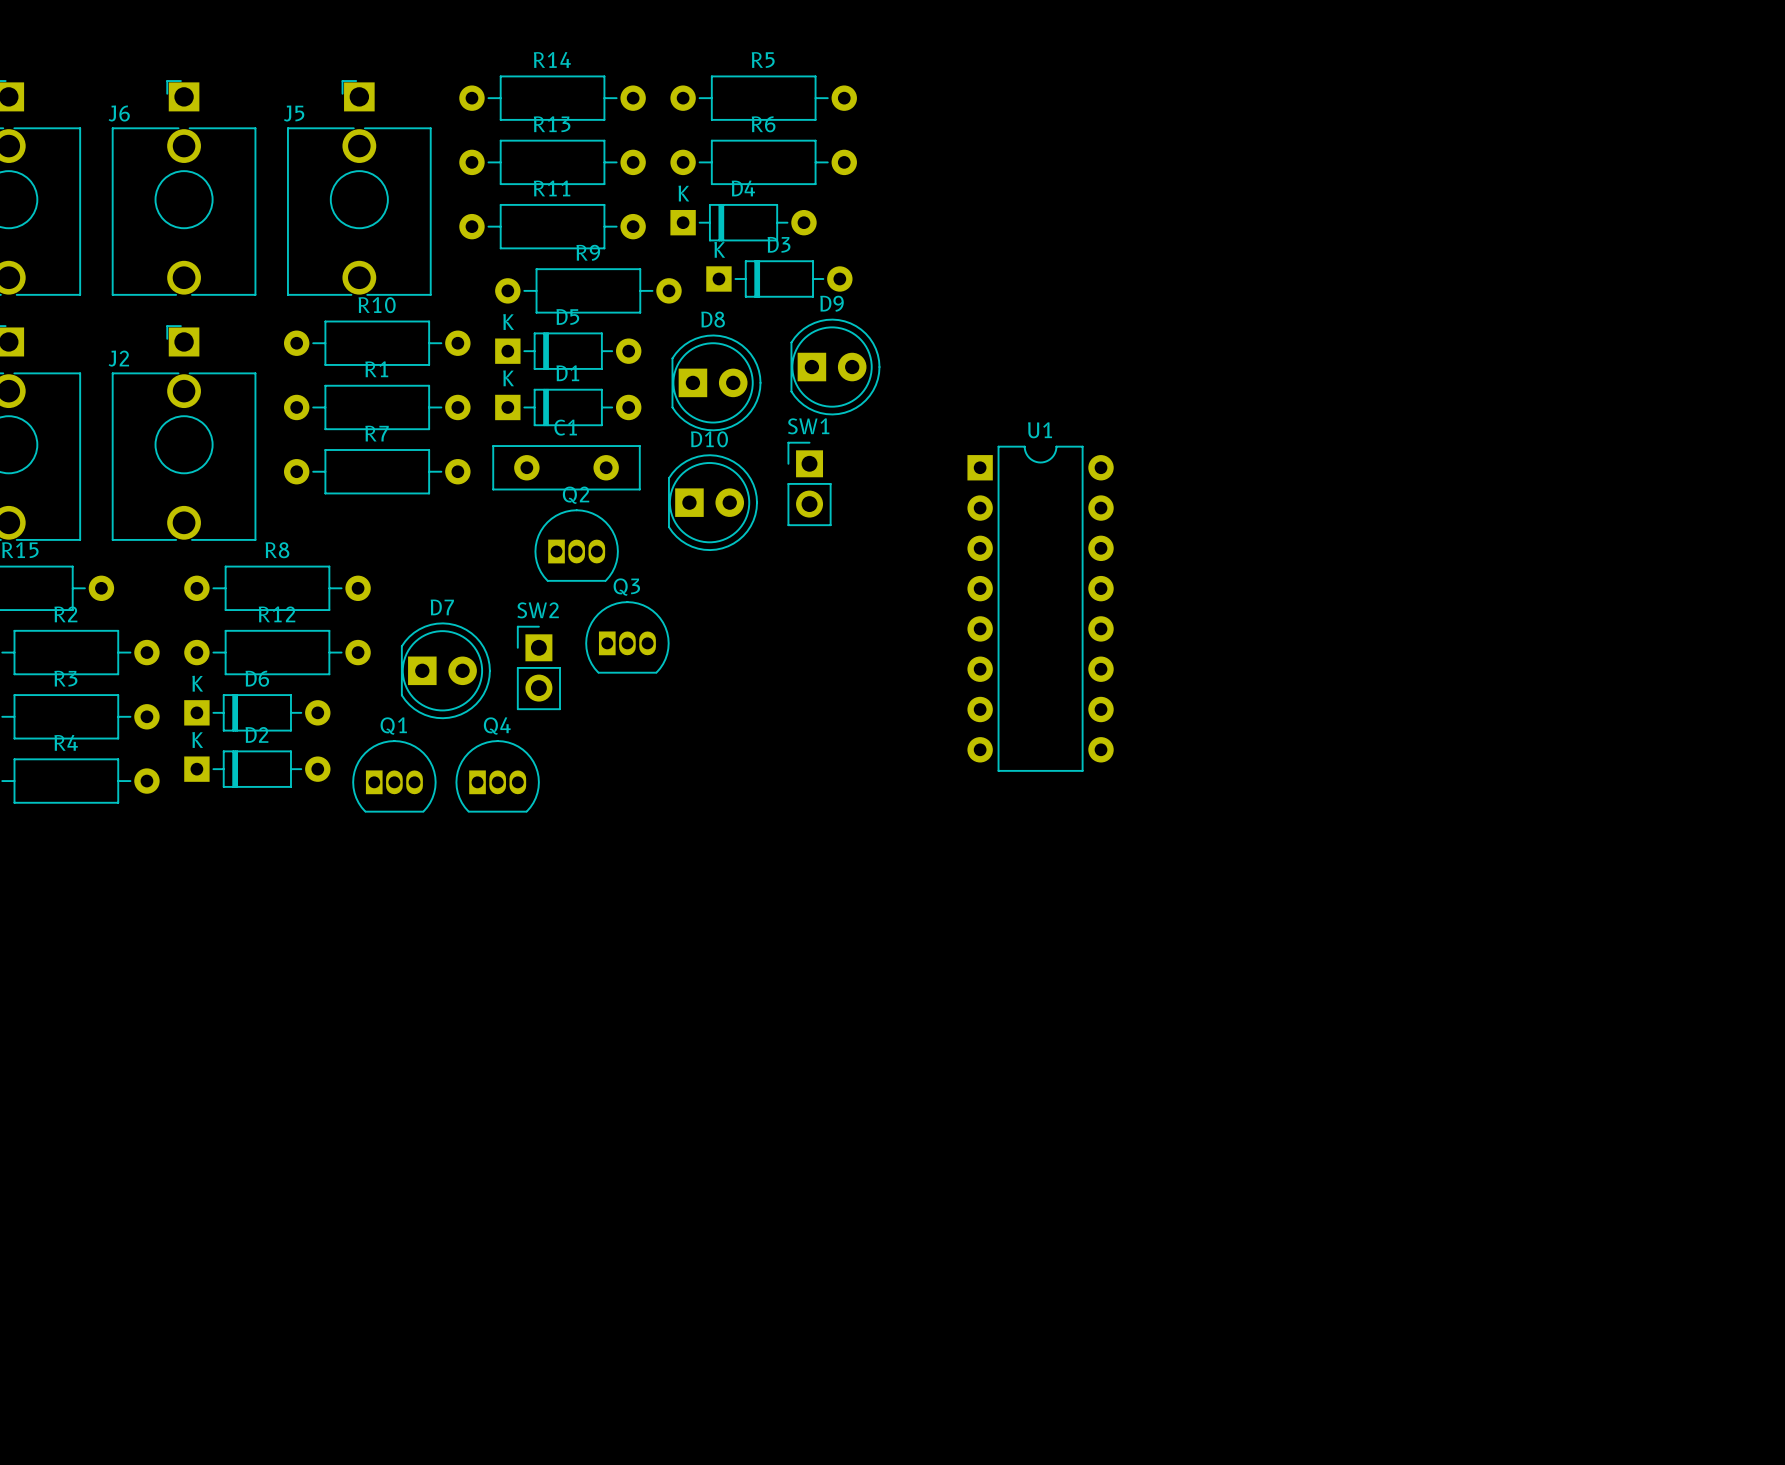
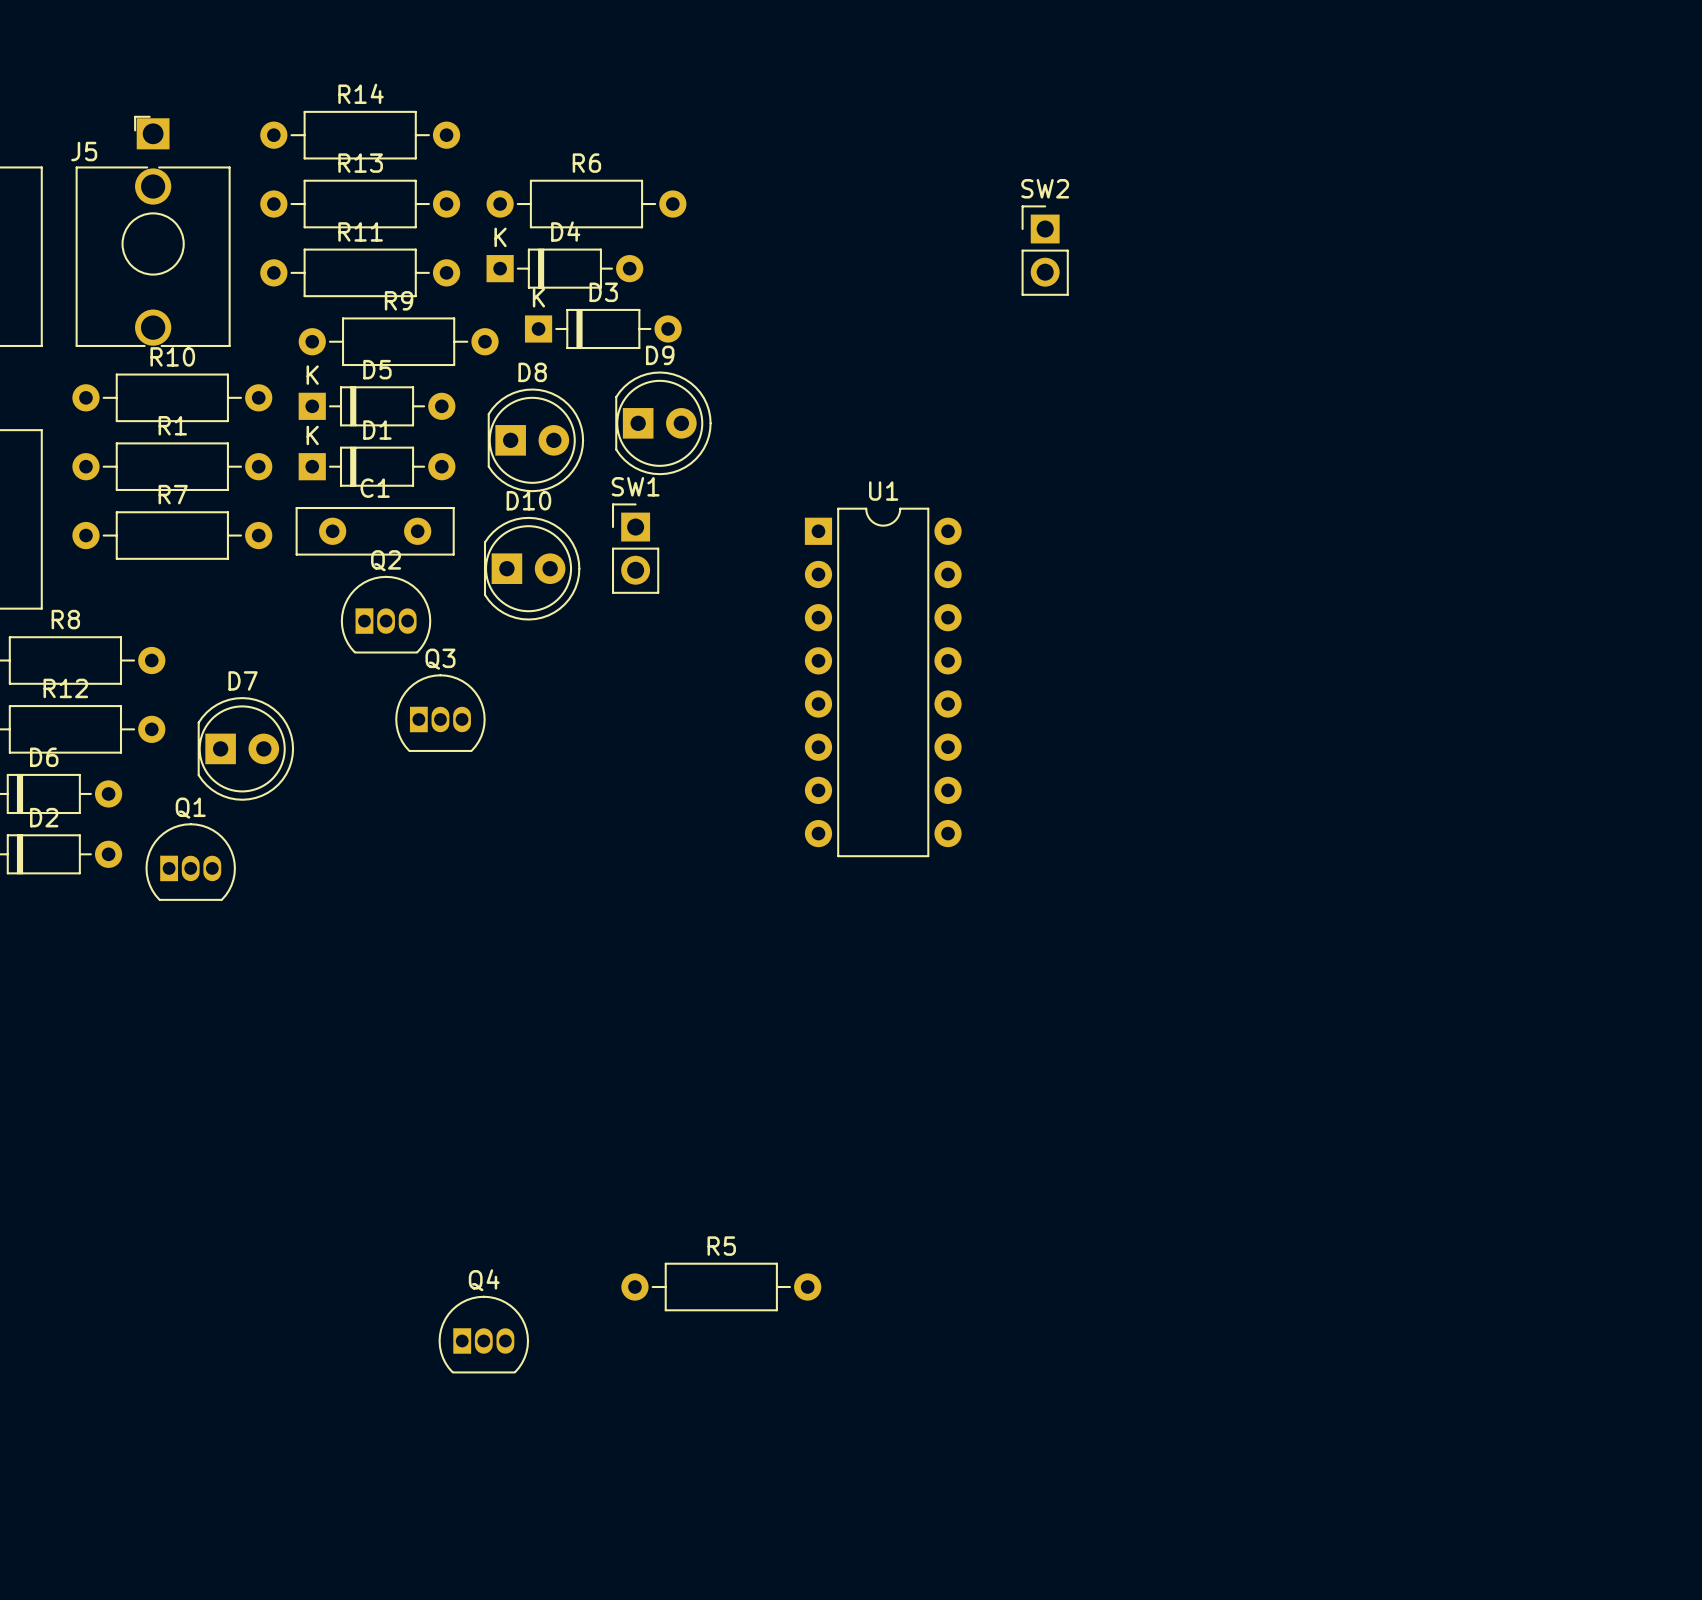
R5 position: (763, 98) -> (721, 1287)
SW2 position: (538, 667) -> (1045, 250)
Q4 position: (497, 776) -> (483, 1334)

